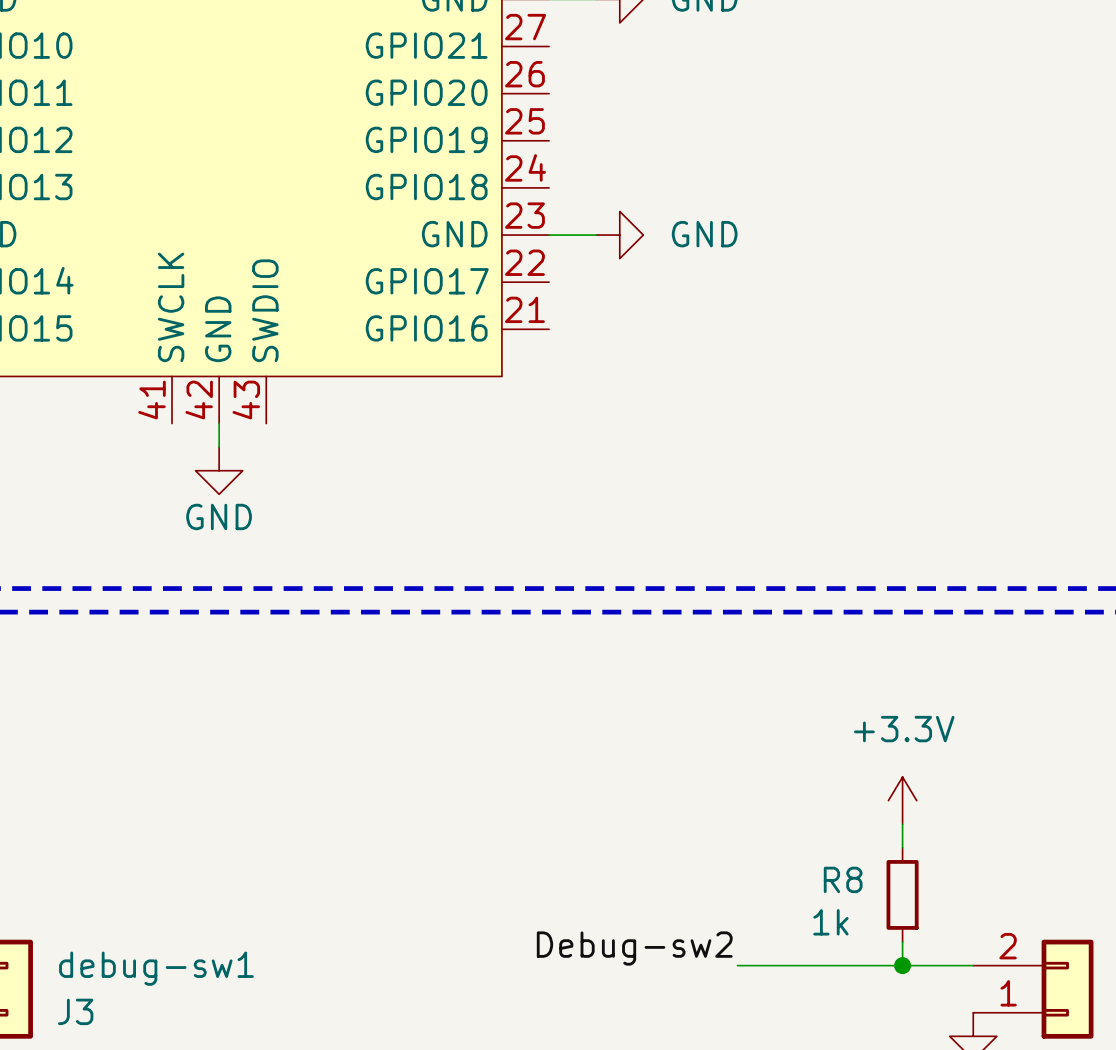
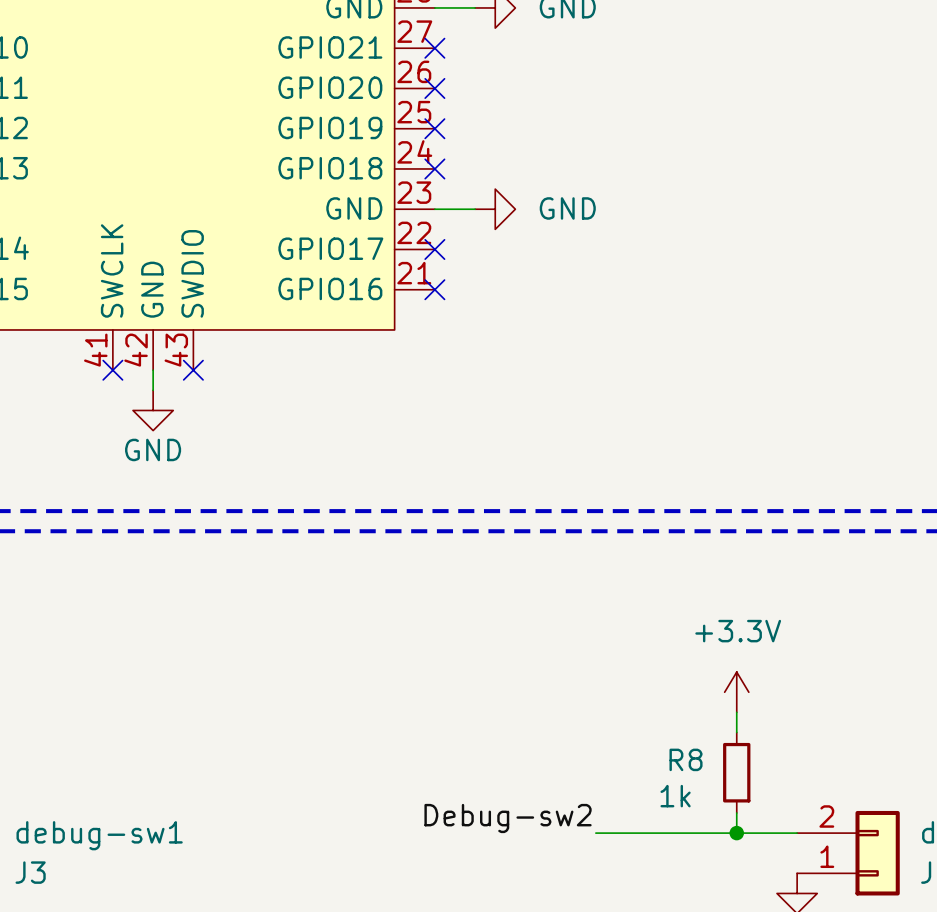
no-connect mark: none -> (434, 48)
no-connect mark: none -> (434, 88)
no-connect mark: none -> (434, 128)
no-connect mark: none -> (434, 168)
no-connect mark: none -> (434, 249)
no-connect mark: none -> (434, 289)
no-connect mark: none -> (112, 370)
no-connect mark: none -> (193, 370)

